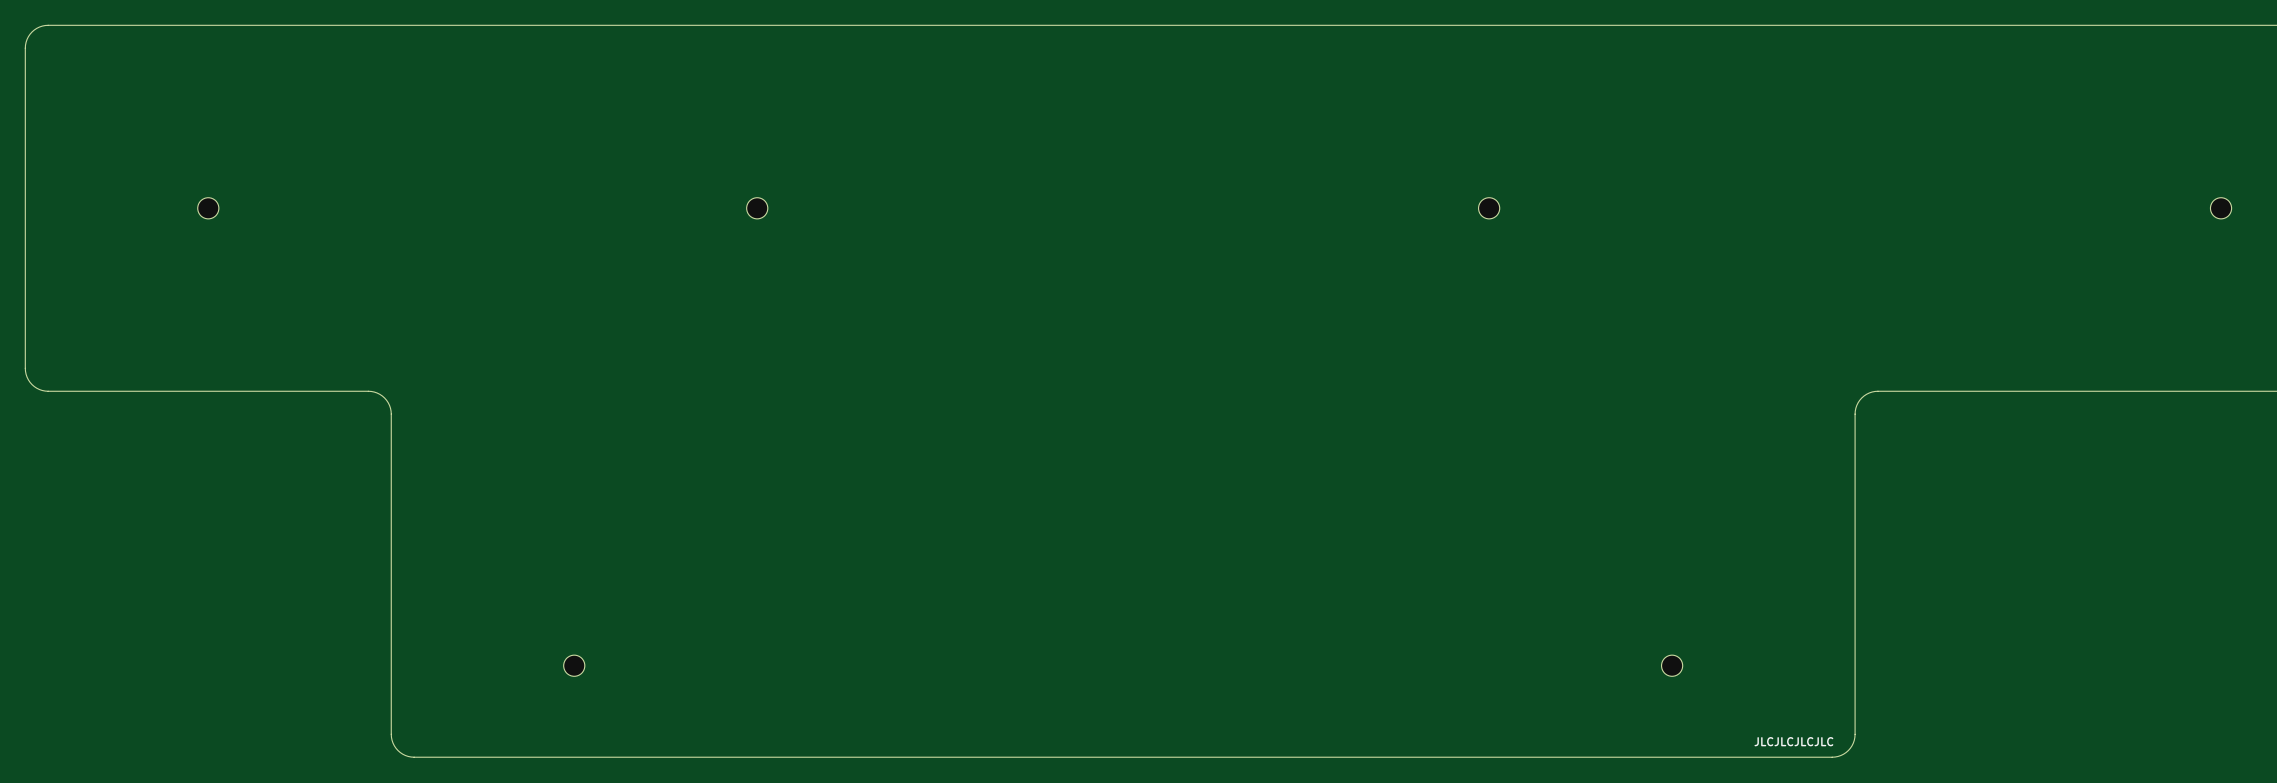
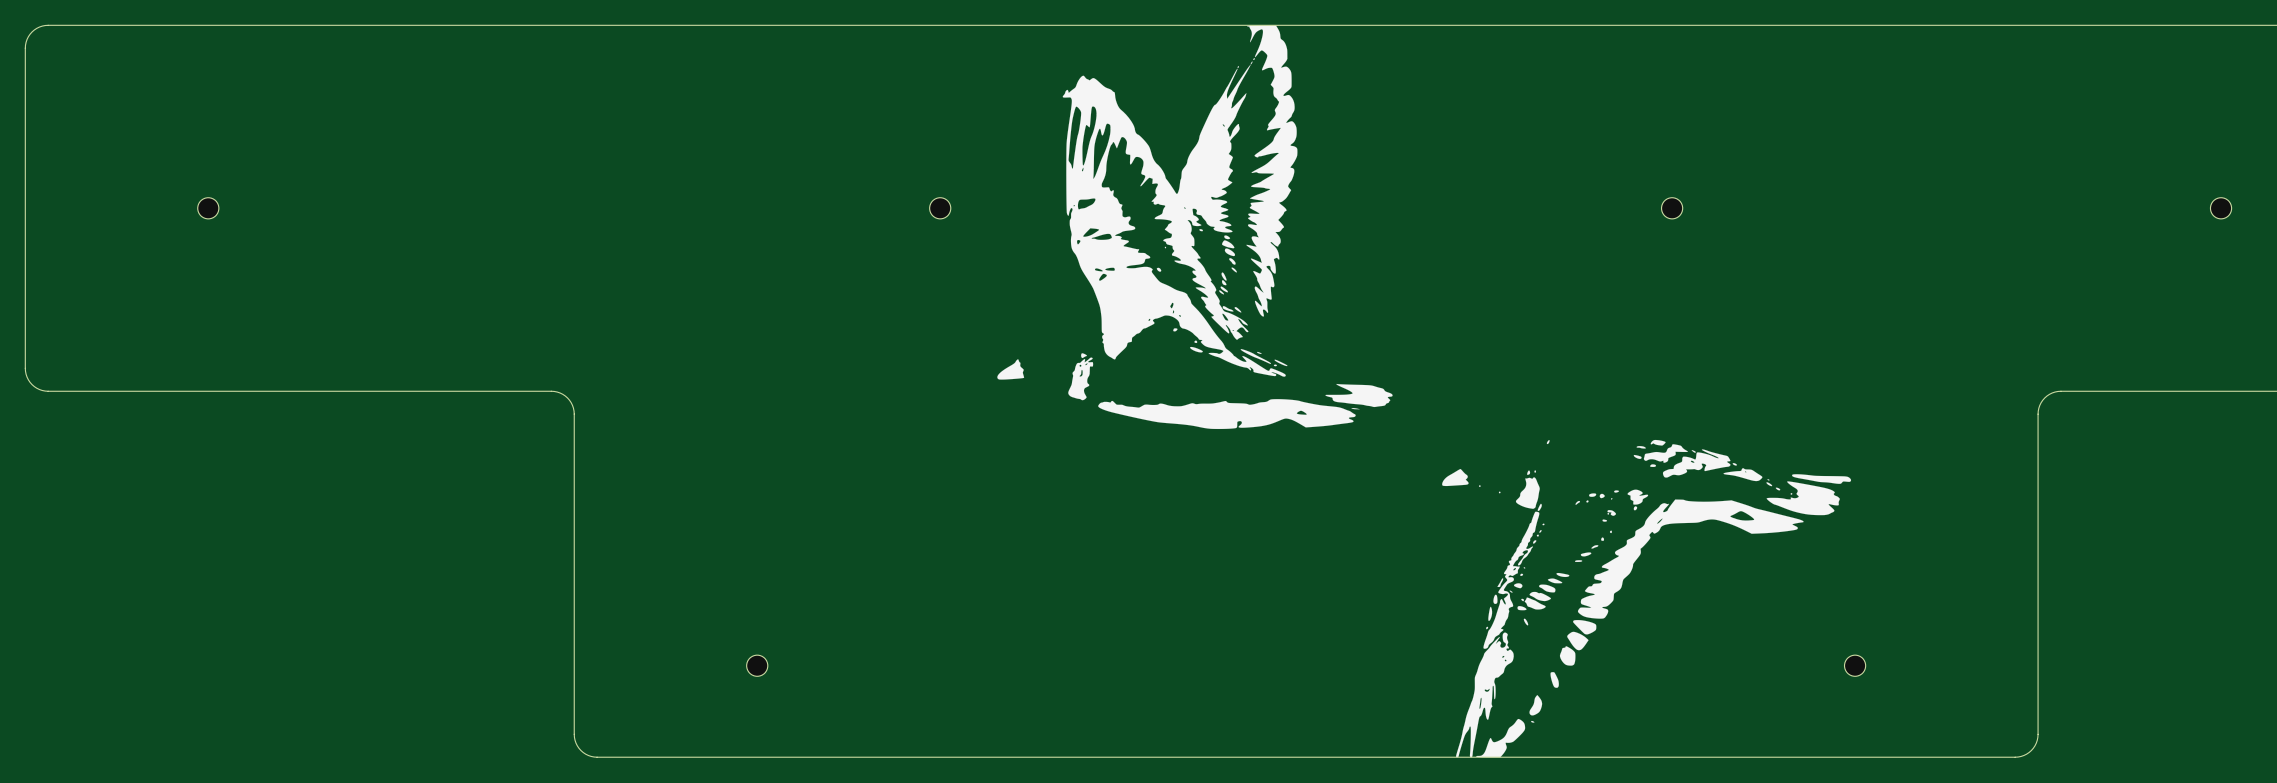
drawing: none -> [997, 25, 1852, 758]
part position: (757, 208) -> (940, 208)
part position: (1489, 208) -> (1672, 208)
board edge: (368, 391) (382, 396) (388, 402) (391, 411) (391, 734) (394, 745) (402, 754) (414, 757) (597, 757) -> (368, 391) (551, 391) (562, 394) (571, 402) (574, 414) (574, 737) (577, 745) (583, 752) (597, 757)
board edge: (2060, 391) (1877, 391) (1866, 394) (1858, 402) (1855, 414) (1854, 737) (1852, 745) (1846, 752) (1832, 757) -> (2060, 391) (2047, 396) (2041, 402) (2038, 411) (2038, 734) (2034, 745) (2026, 754) (2015, 757) (1832, 757)
part position: (574, 665) -> (757, 665)
part position: (1672, 665) -> (1855, 665)
drawing: [1754, 737, 1834, 747] -> none

